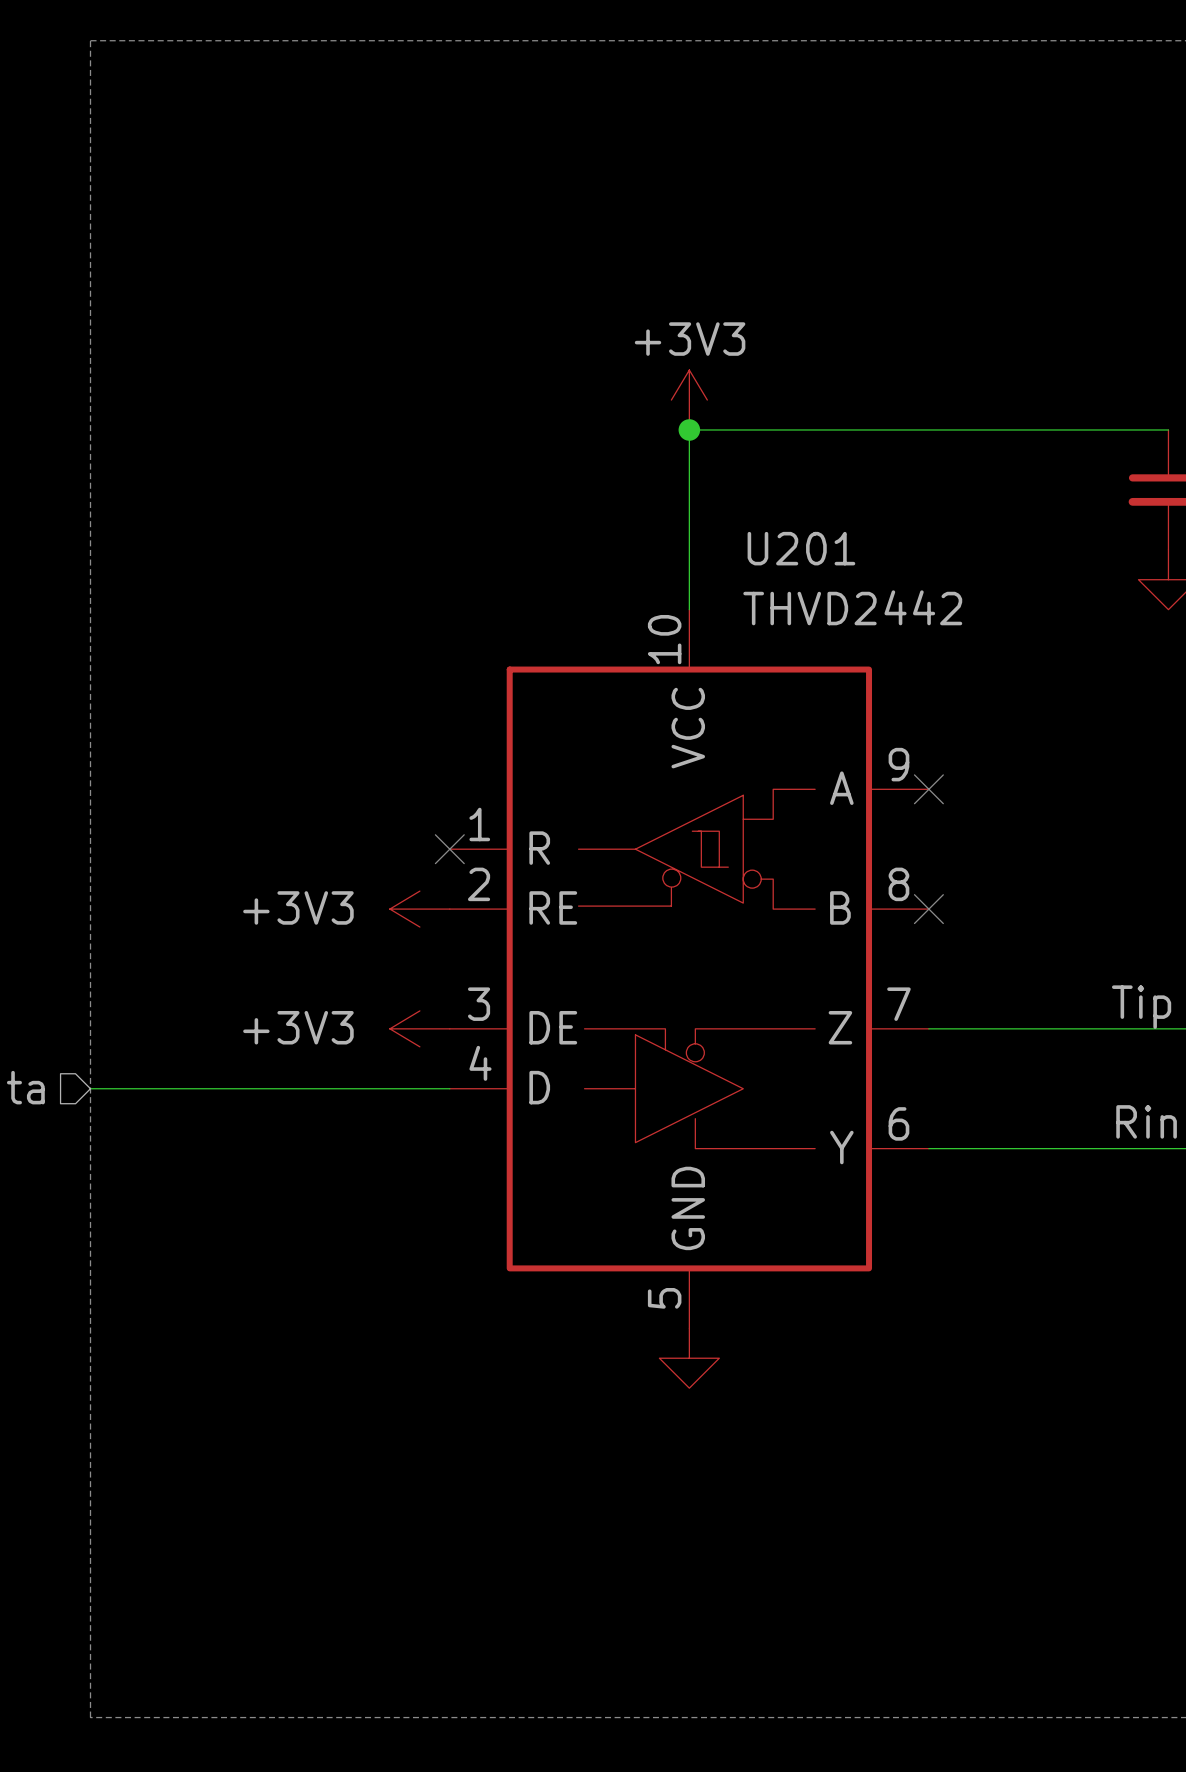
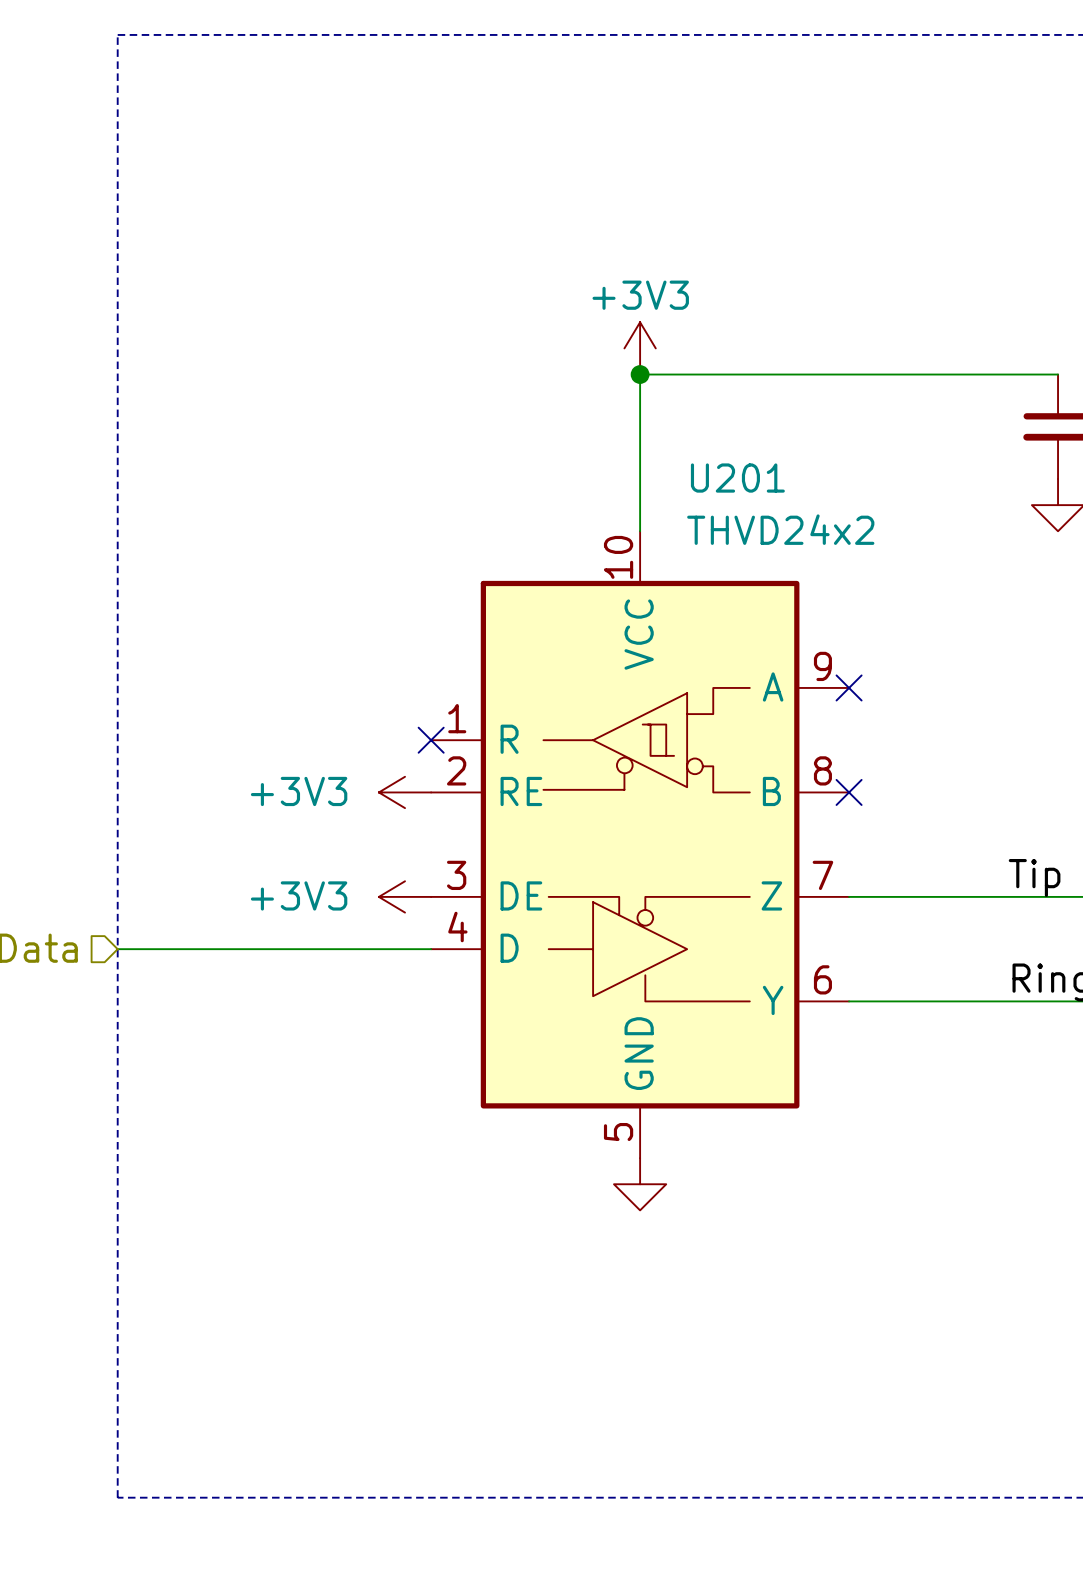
U201 value: THVD2442 (852, 607) -> THVD24x2 (780, 529)

